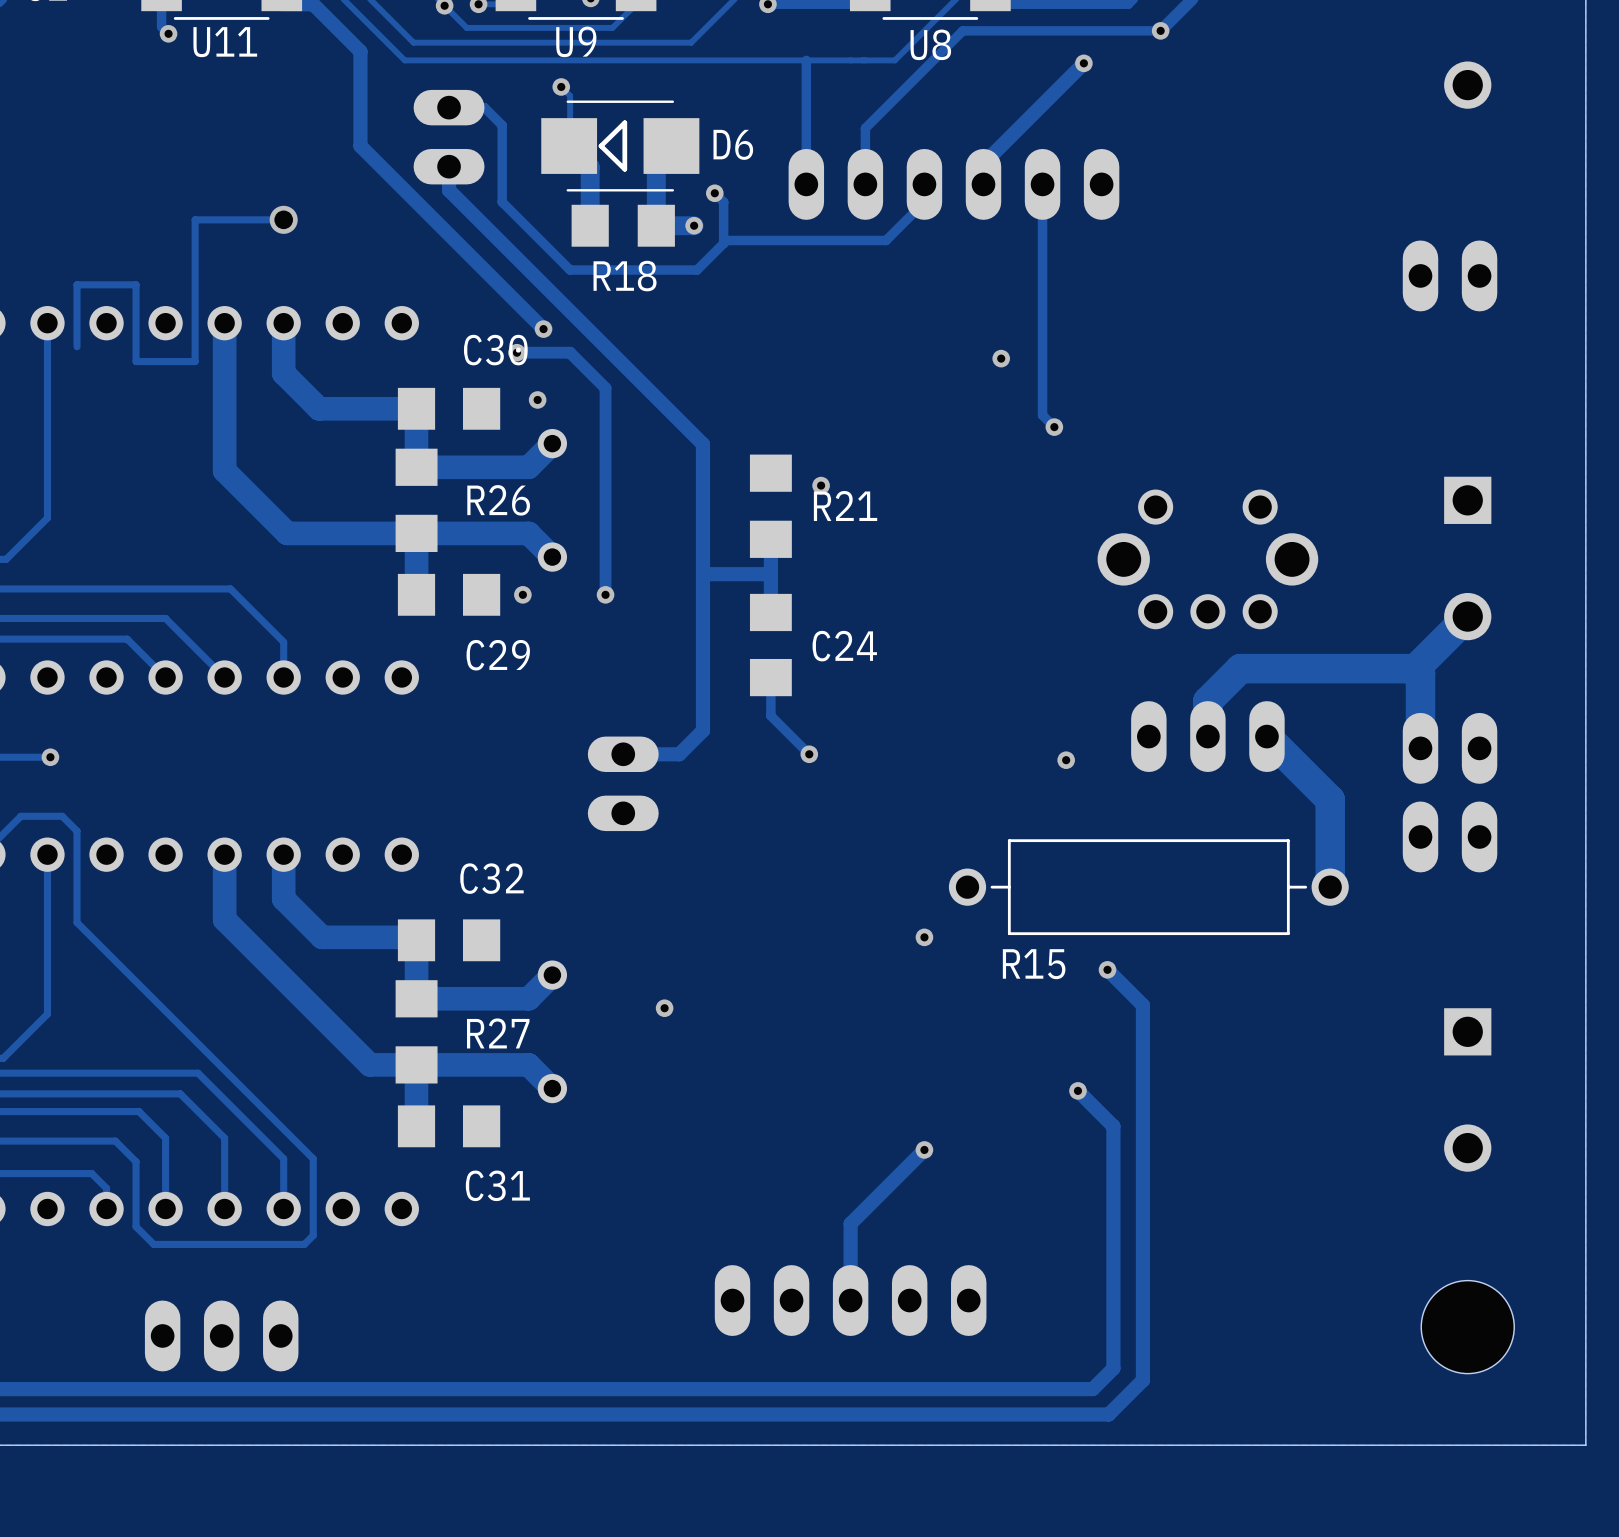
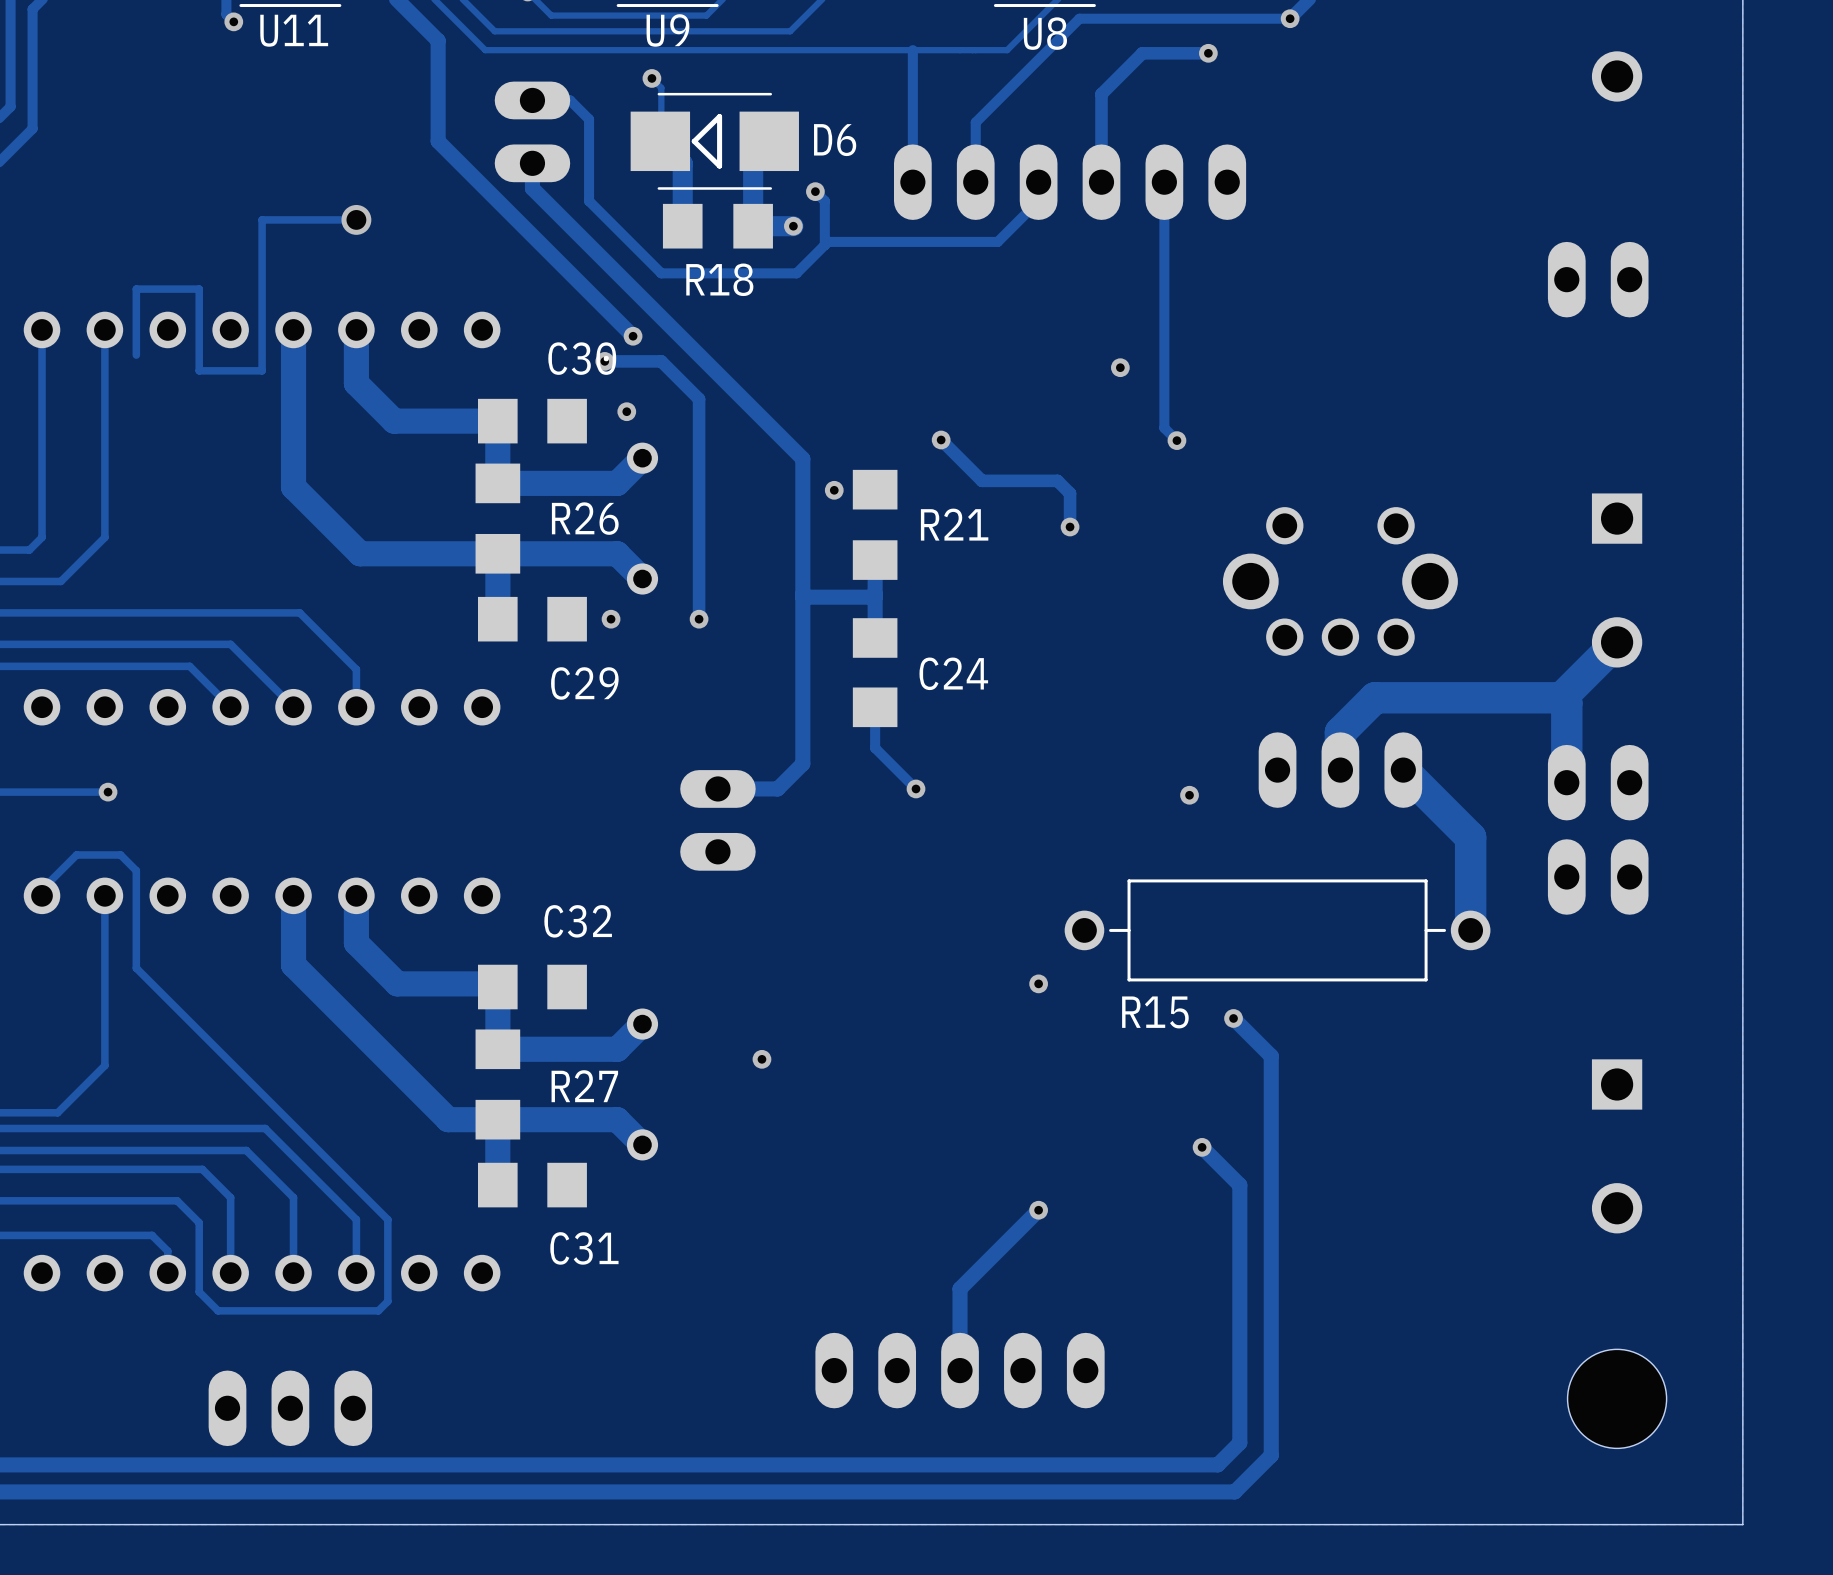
track: (1083, 63) (983, 163) -> (1208, 53) (1142, 53) (1101, 94) (1101, 160)
track: none -> (941, 439) (982, 480) (1057, 480) (1070, 493) (1070, 527)
via: none -> (941, 439)
via: none -> (834, 490)
via: (821, 485) -> none
via: none -> (1070, 527)

